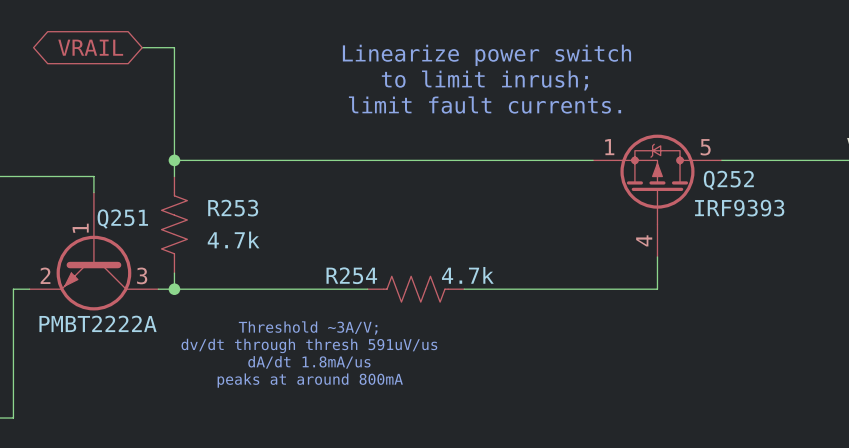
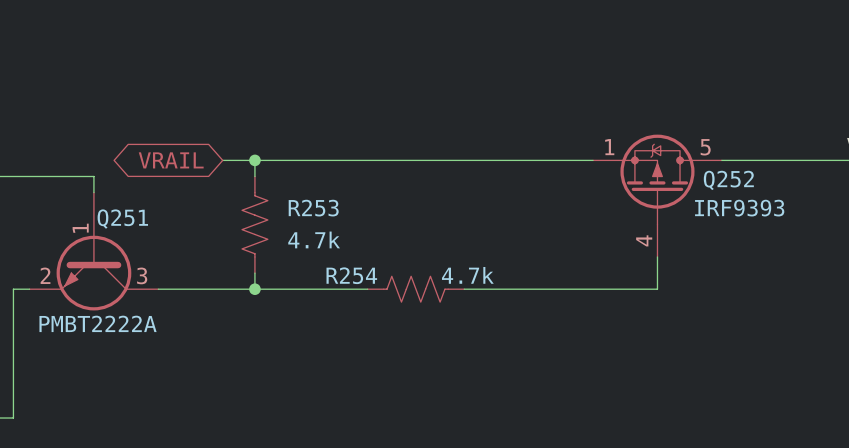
global label position: VRAIL (90, 47) -> VRAIL (171, 160)
wire: (142, 47) (174, 47) (174, 176) -> none
text: Linearize power switch (486, 55) -> none
text: to limit inrush; (484, 80) -> none
text: limit fault currents. (485, 105) -> none
wire: (174, 160) (222, 160) -> none
junction: (174, 160) -> none
wire: none -> (254, 160) (254, 176)
junction: none -> (254, 160)
R253 position: (174, 224) -> (254, 224)
wire: (174, 273) (174, 289) -> (254, 273) (254, 289)
junction: (174, 289) -> none
junction: none -> (254, 289)
text: Threshold ~3A/V; (308, 328) -> none
text: dv/dt through thresh 591uV/us (309, 345) -> none
text: dA/dt 1.8mA/us (309, 362) -> none
text: peaks at around 800mA (310, 380) -> none

